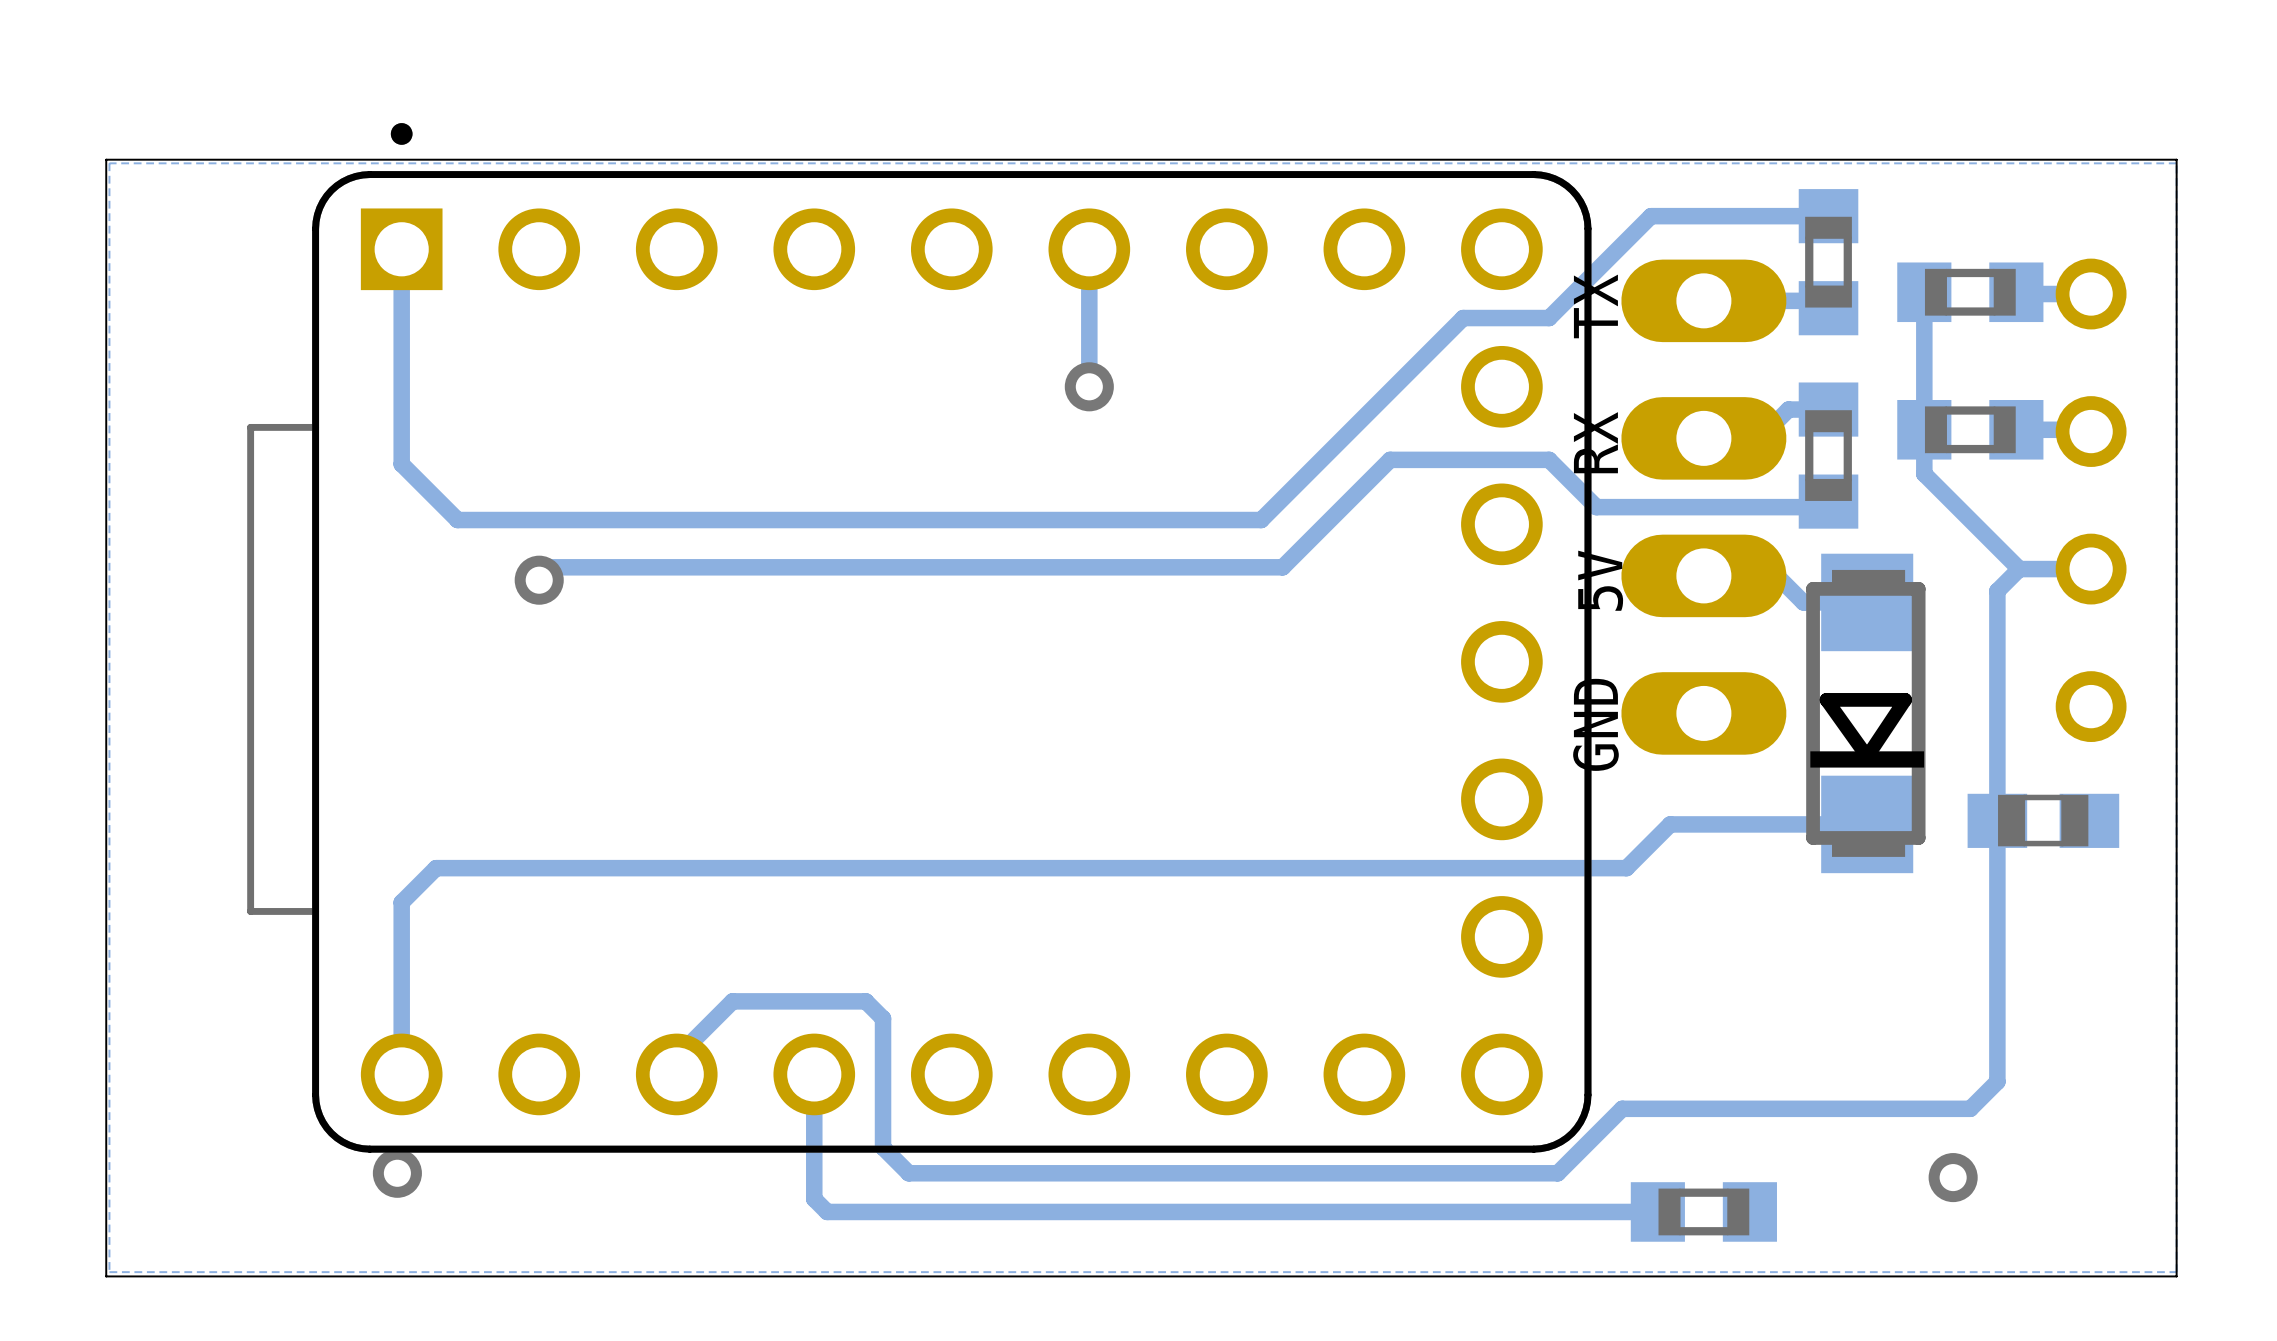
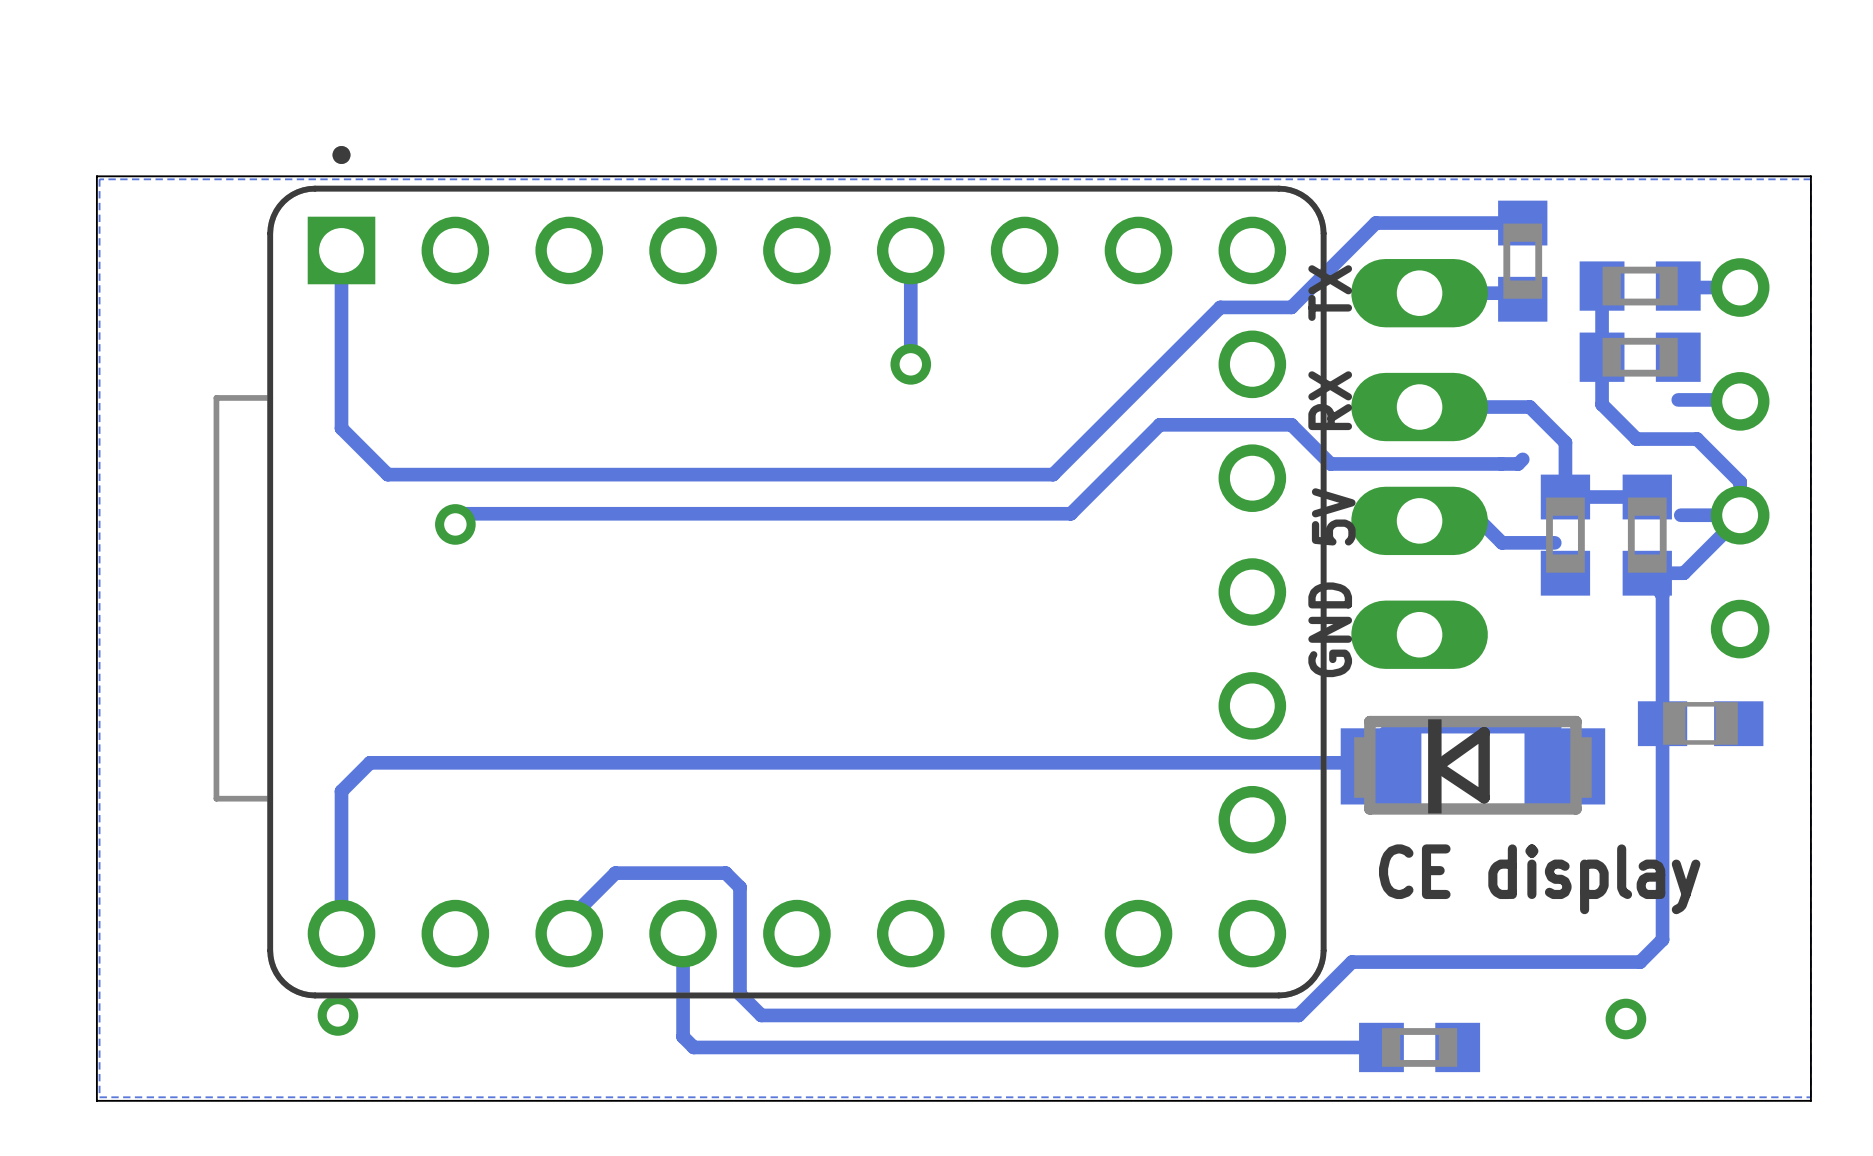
track: (1828, 409) (1788, 409) (1759, 438) -> (1647, 497) (1640, 488) (1632, 497) (1565, 497) (1565, 442) (1529, 407) (1465, 407)
part position: (1970, 429) -> (1640, 357)
track: (1924, 435) (1924, 474) (2019, 569) (1997, 591) (1997, 666) -> (1602, 404) (1636, 439) (1697, 439) (1740, 482) (1740, 516) (1683, 573) (1647, 573) (1662, 595)
part: (1828, 455) -> none
part: none -> (1565, 535)
part: none -> (1647, 535)
part rotation: 0° (1865, 713) -> 90° clockwise (1472, 765)
text: none -> CE display (1539, 879)

